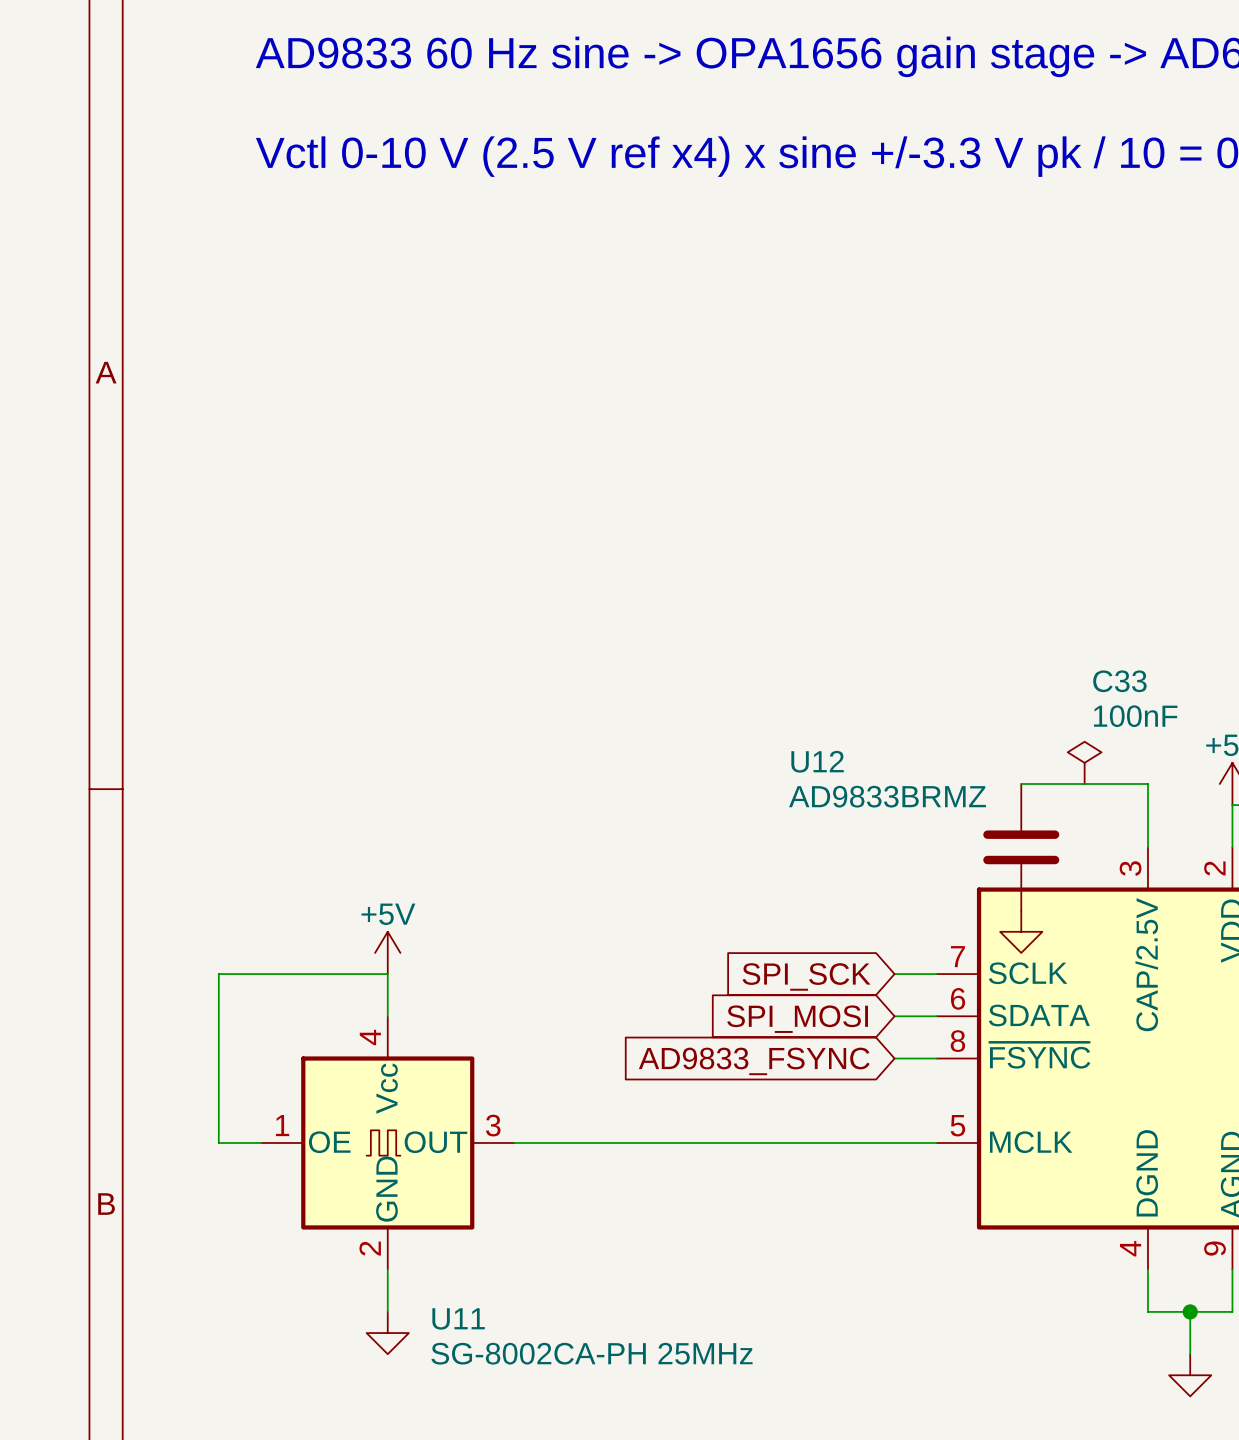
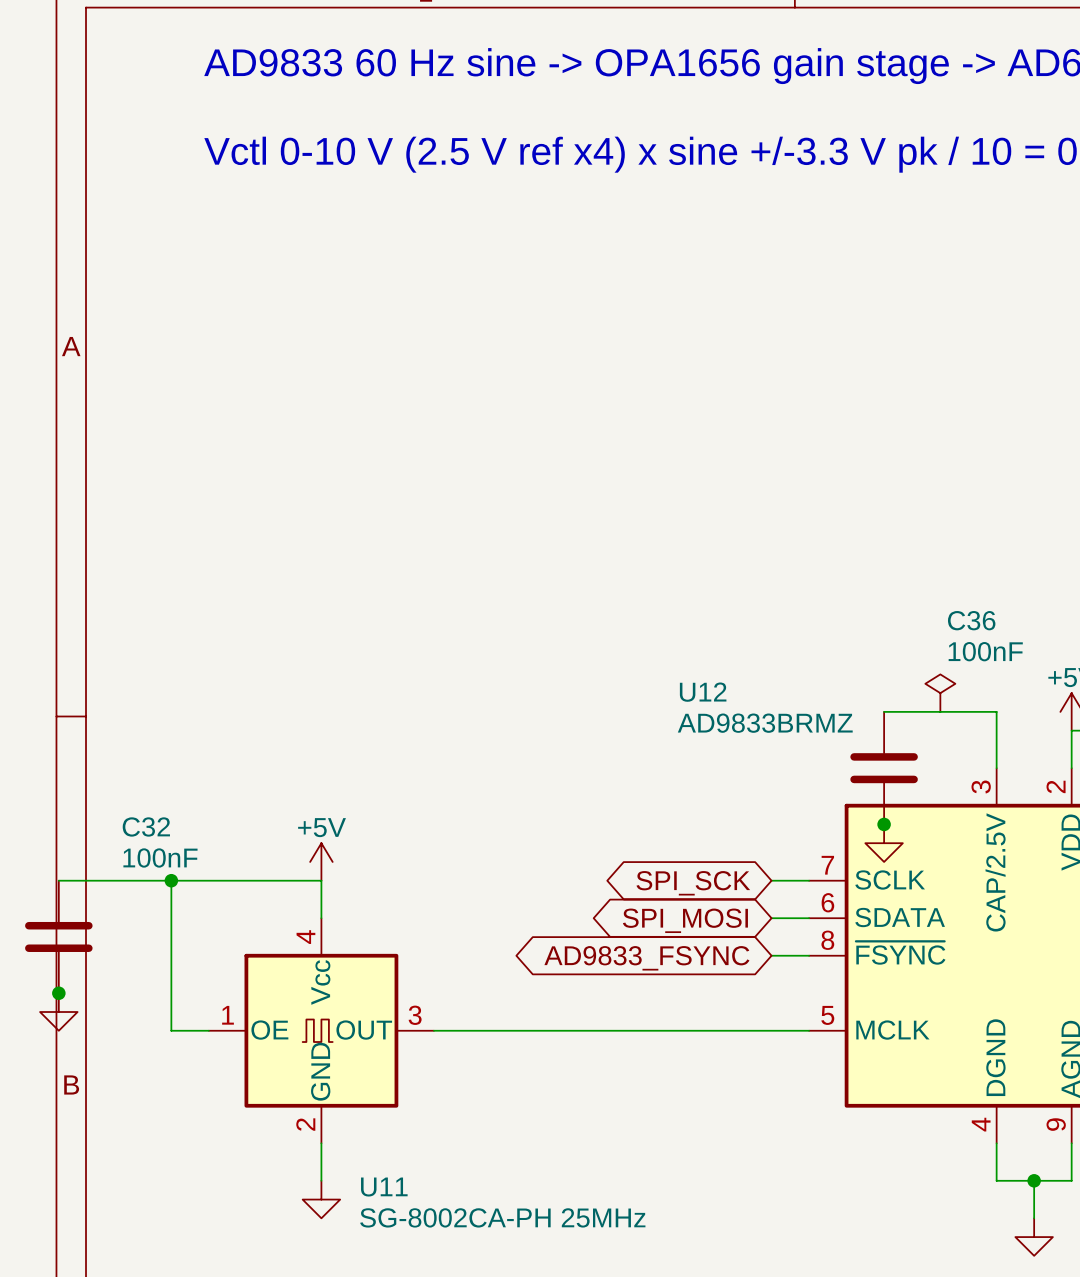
C33 name: C33 (1119, 681) -> C36 (971, 620)
junction: none -> (884, 824)
wire: none -> (58, 880) (171, 880)
junction: none -> (171, 880)
global label shape: input (806, 976) -> bidirectional (693, 883)
global label shape: input (797, 1019) -> bidirectional (685, 920)
C32: none -> 100nF (58, 936)
global label shape: input (754, 1061) -> bidirectional (646, 958)
junction: none -> (58, 993)
power symbol: none -> (58, 1012)

